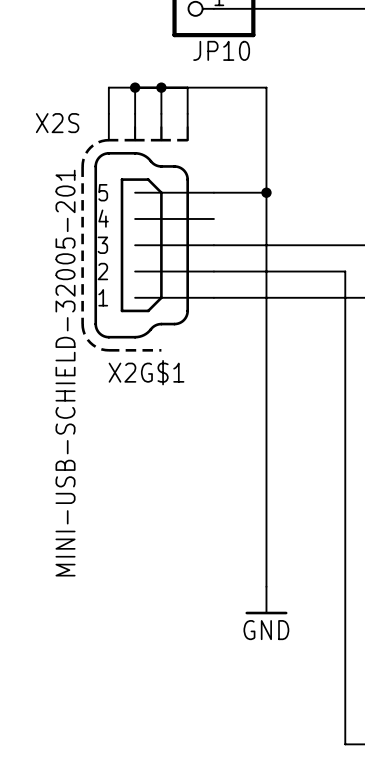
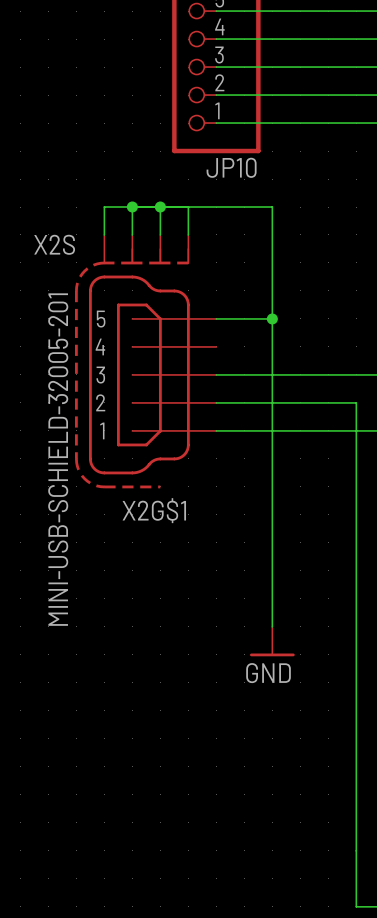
wire: (266, 481) (266, 586) -> none
power symbol position: GND (266, 600) -> GND (272, 641)

